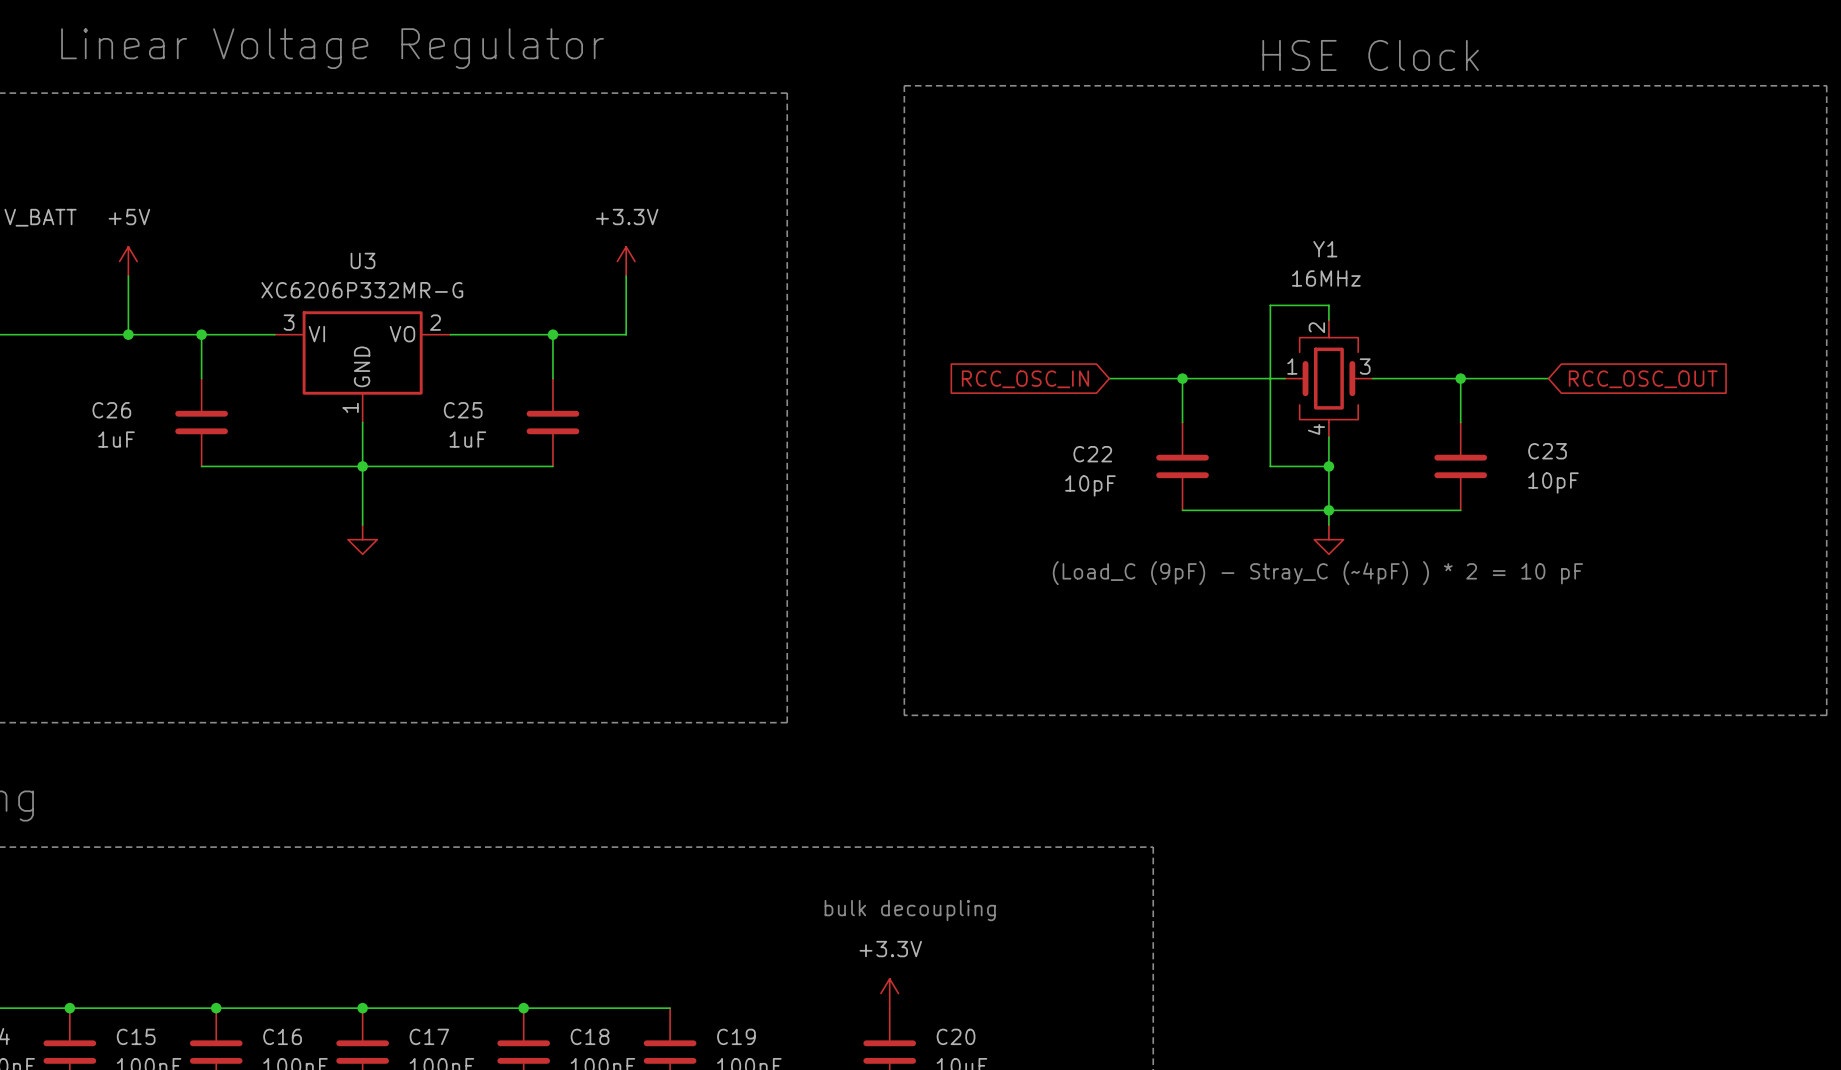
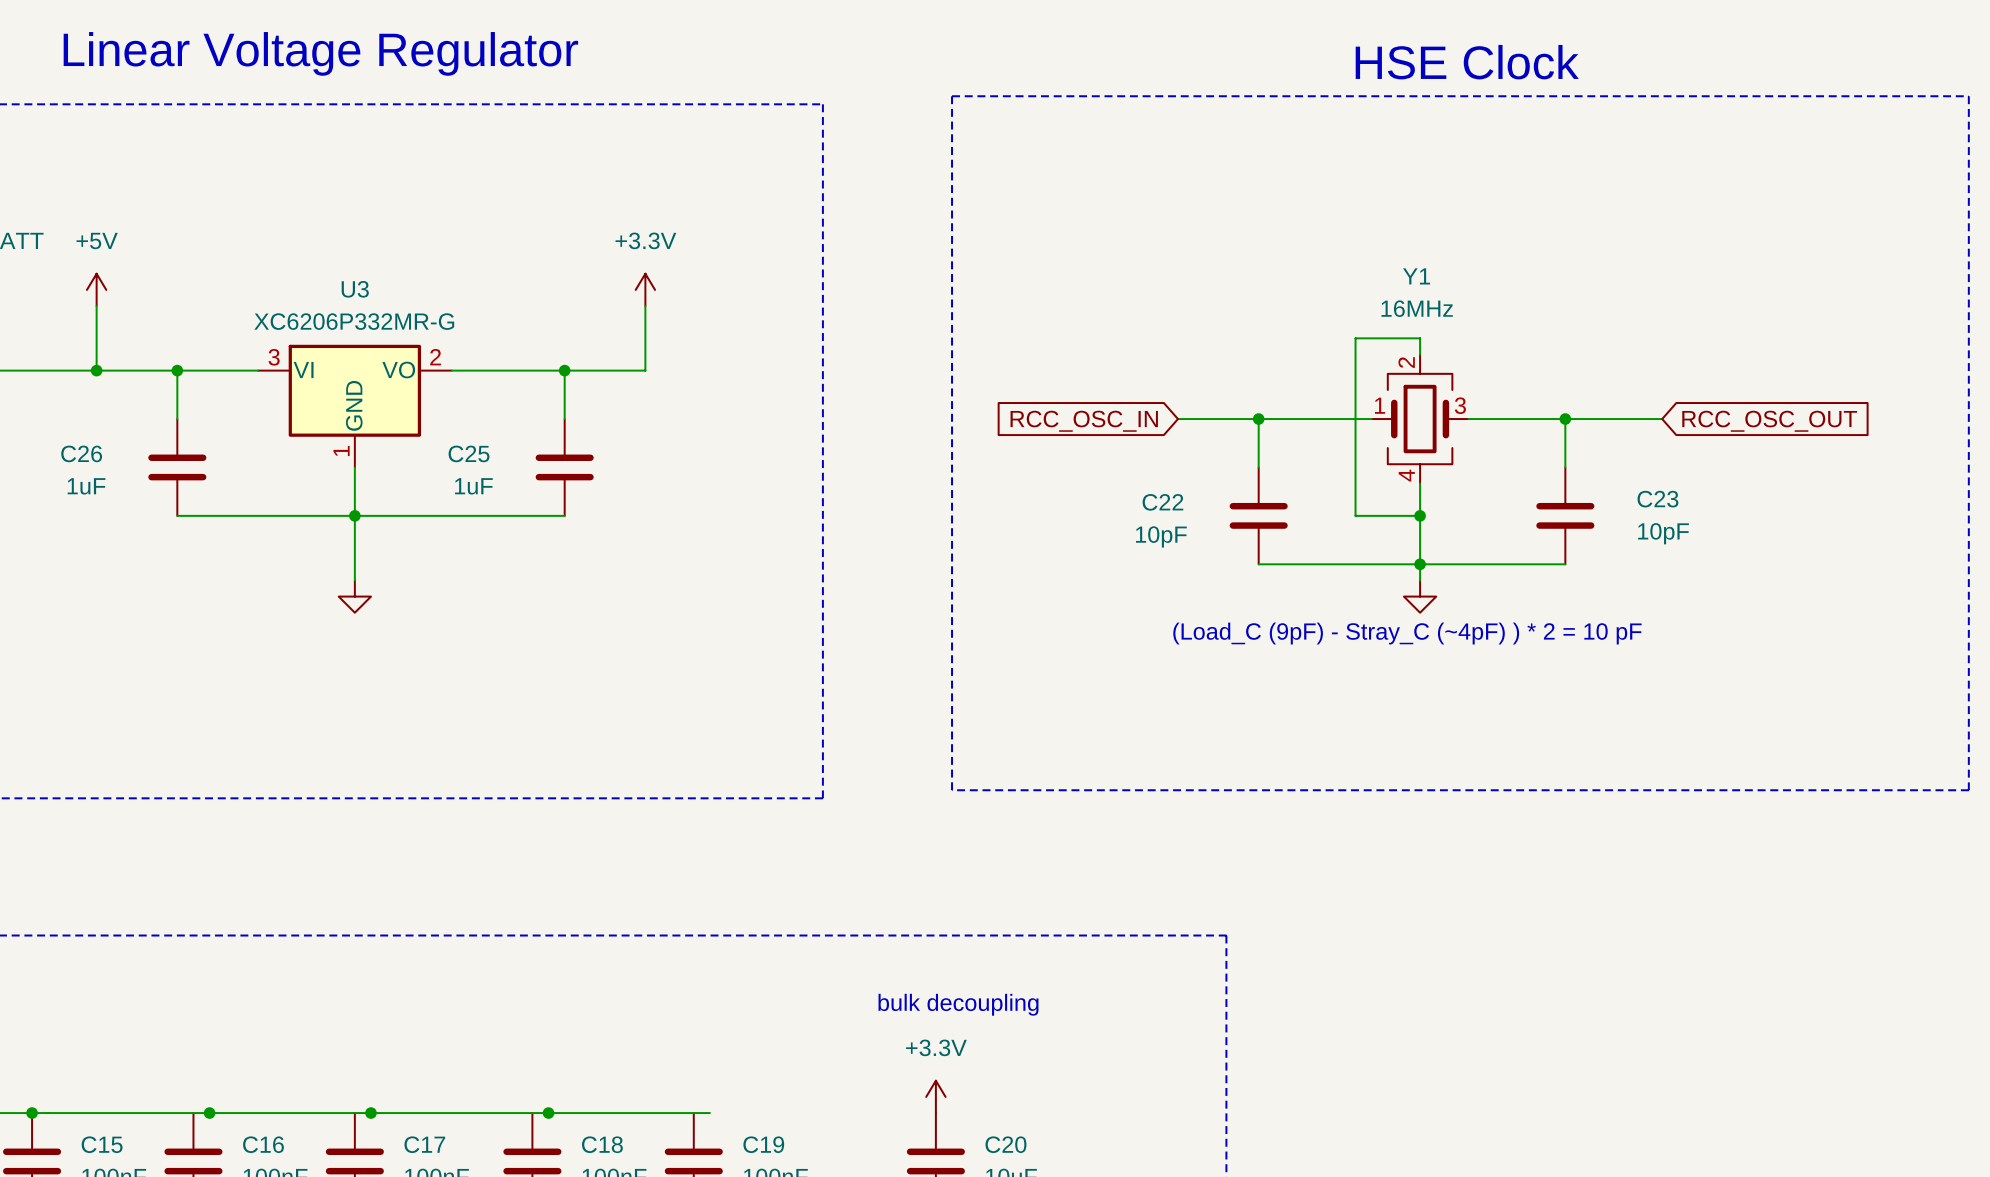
junction position: (216, 1008) -> (209, 1113)
junction position: (362, 1008) -> (371, 1113)
junction position: (523, 1008) -> (548, 1113)
wire: none -> (693, 1113) (709, 1113)

